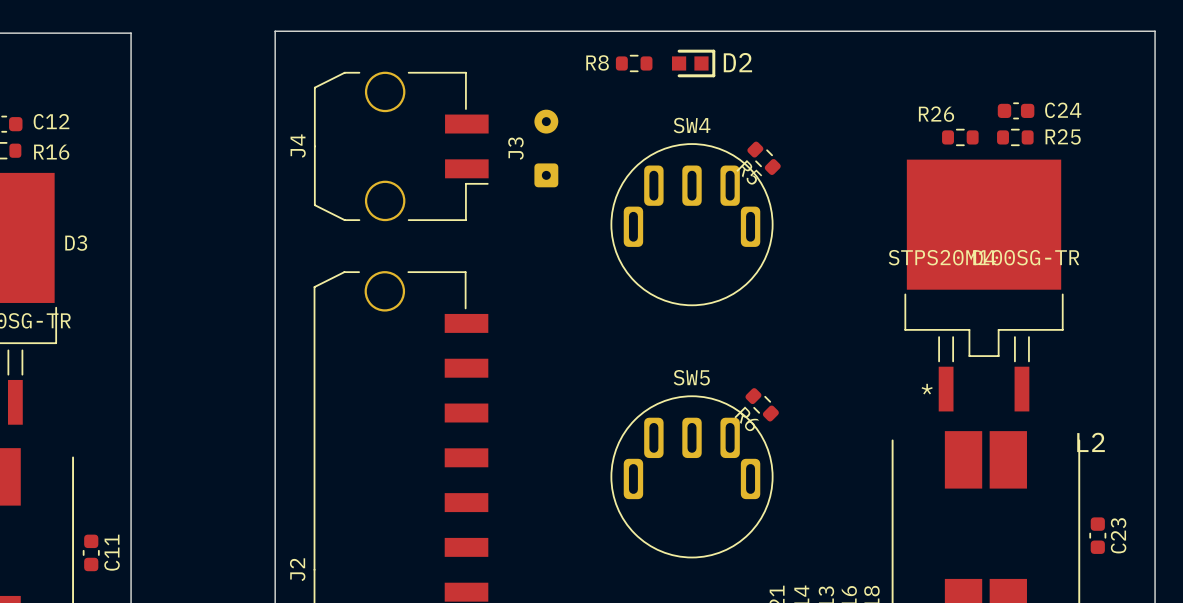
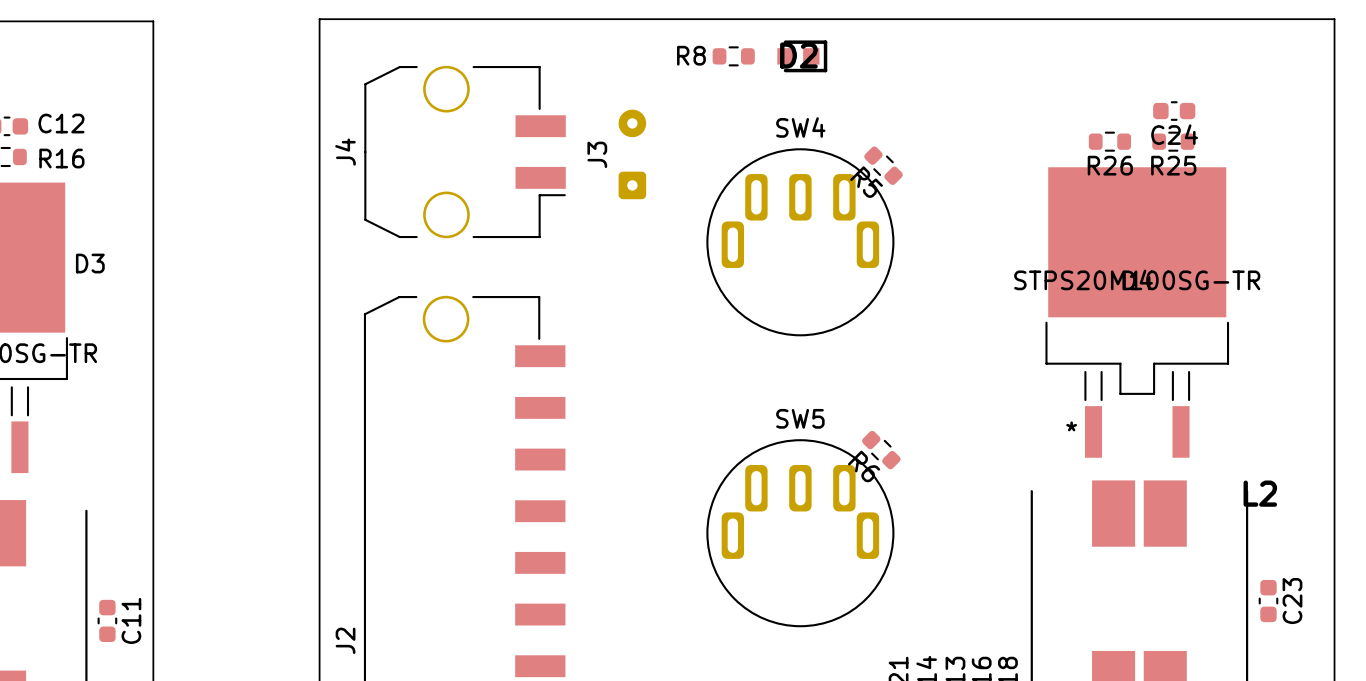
D2 name position: D2 (737, 62) -> D2 (798, 55)
C24 name position: C24 (1063, 110) -> C24 (1174, 134)
R26 name position: R26 (936, 114) -> R26 (1110, 165)
R25 name position: R25 (1063, 136) -> R25 (1173, 165)

